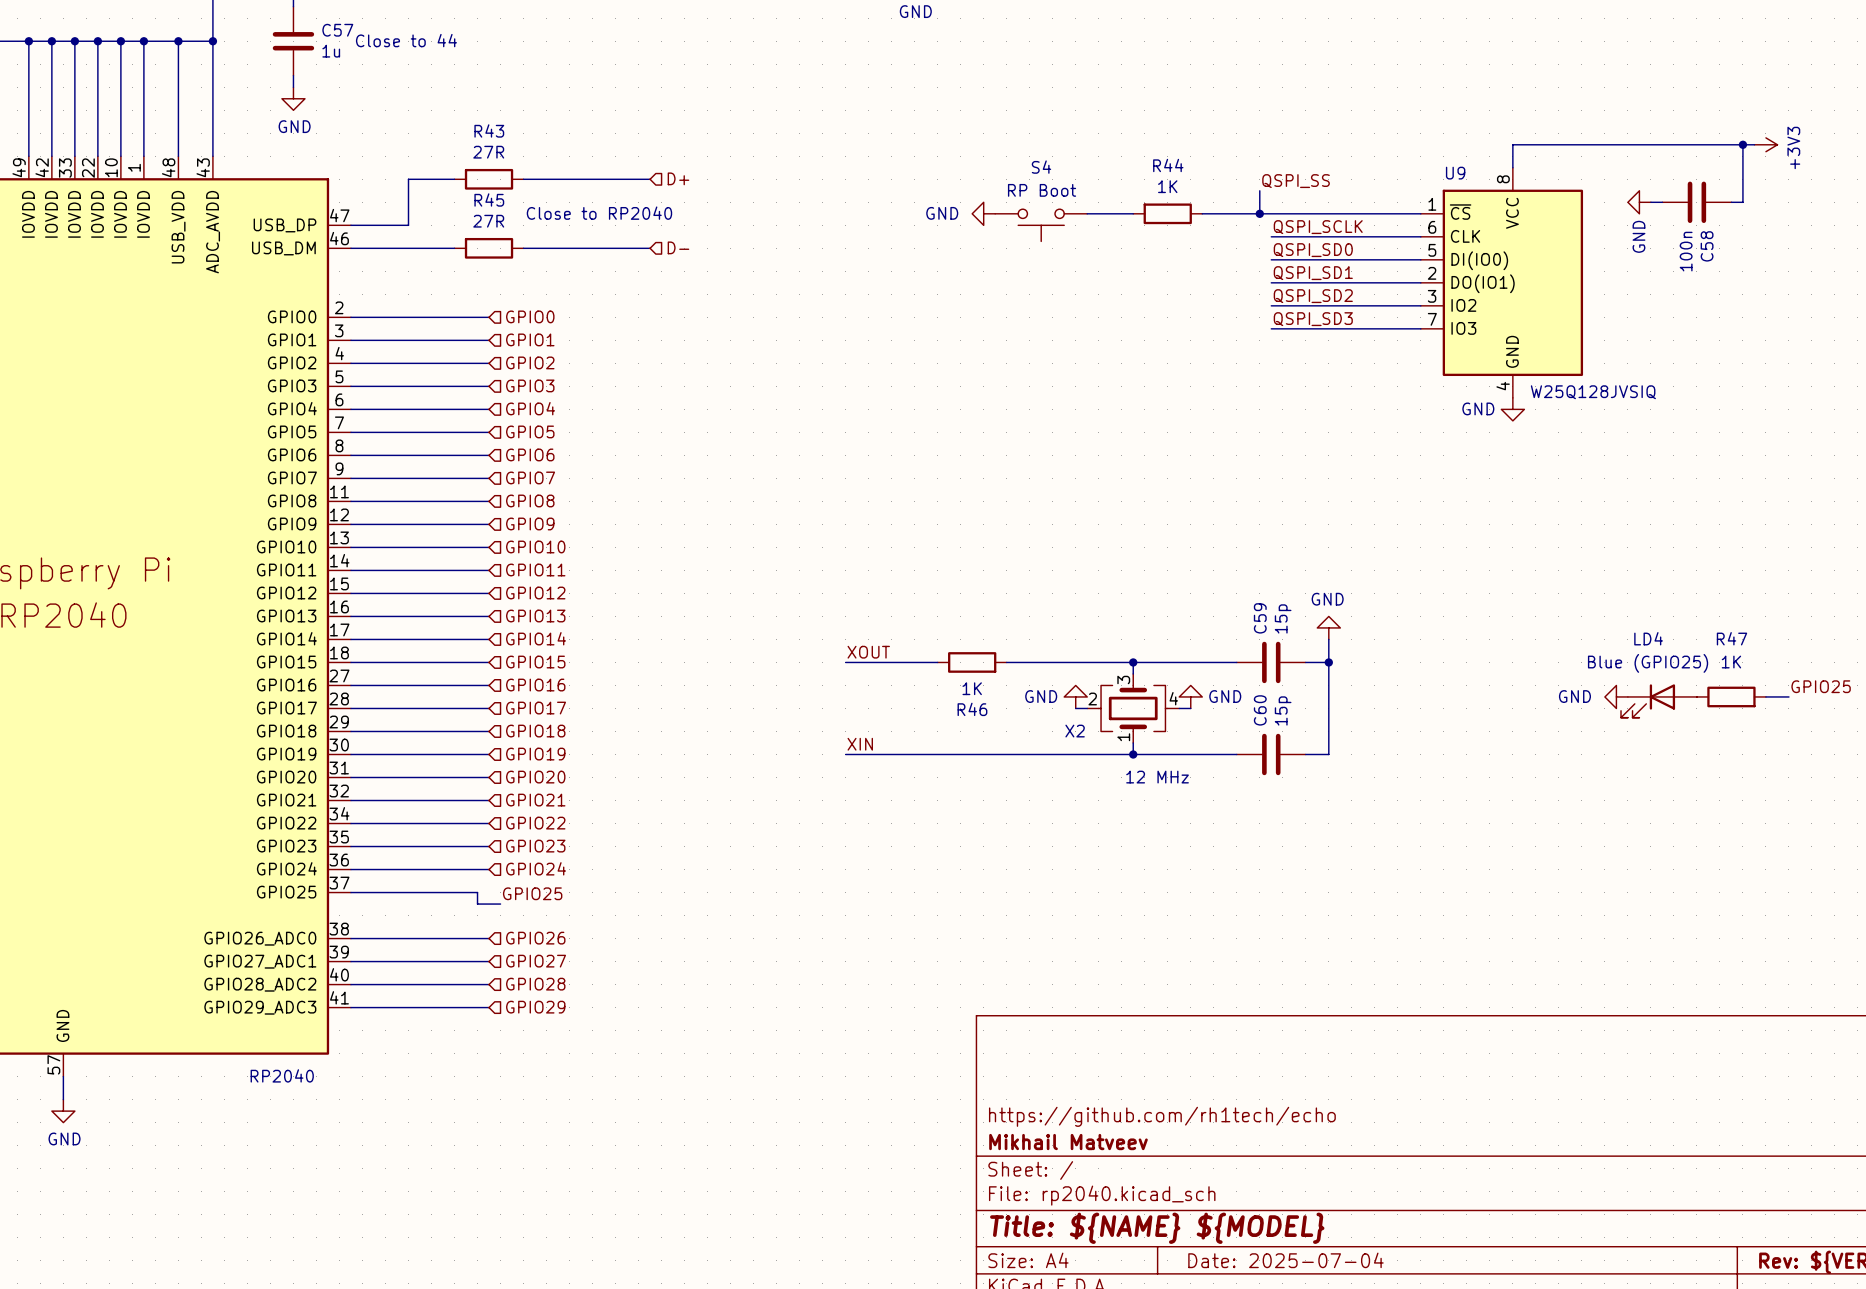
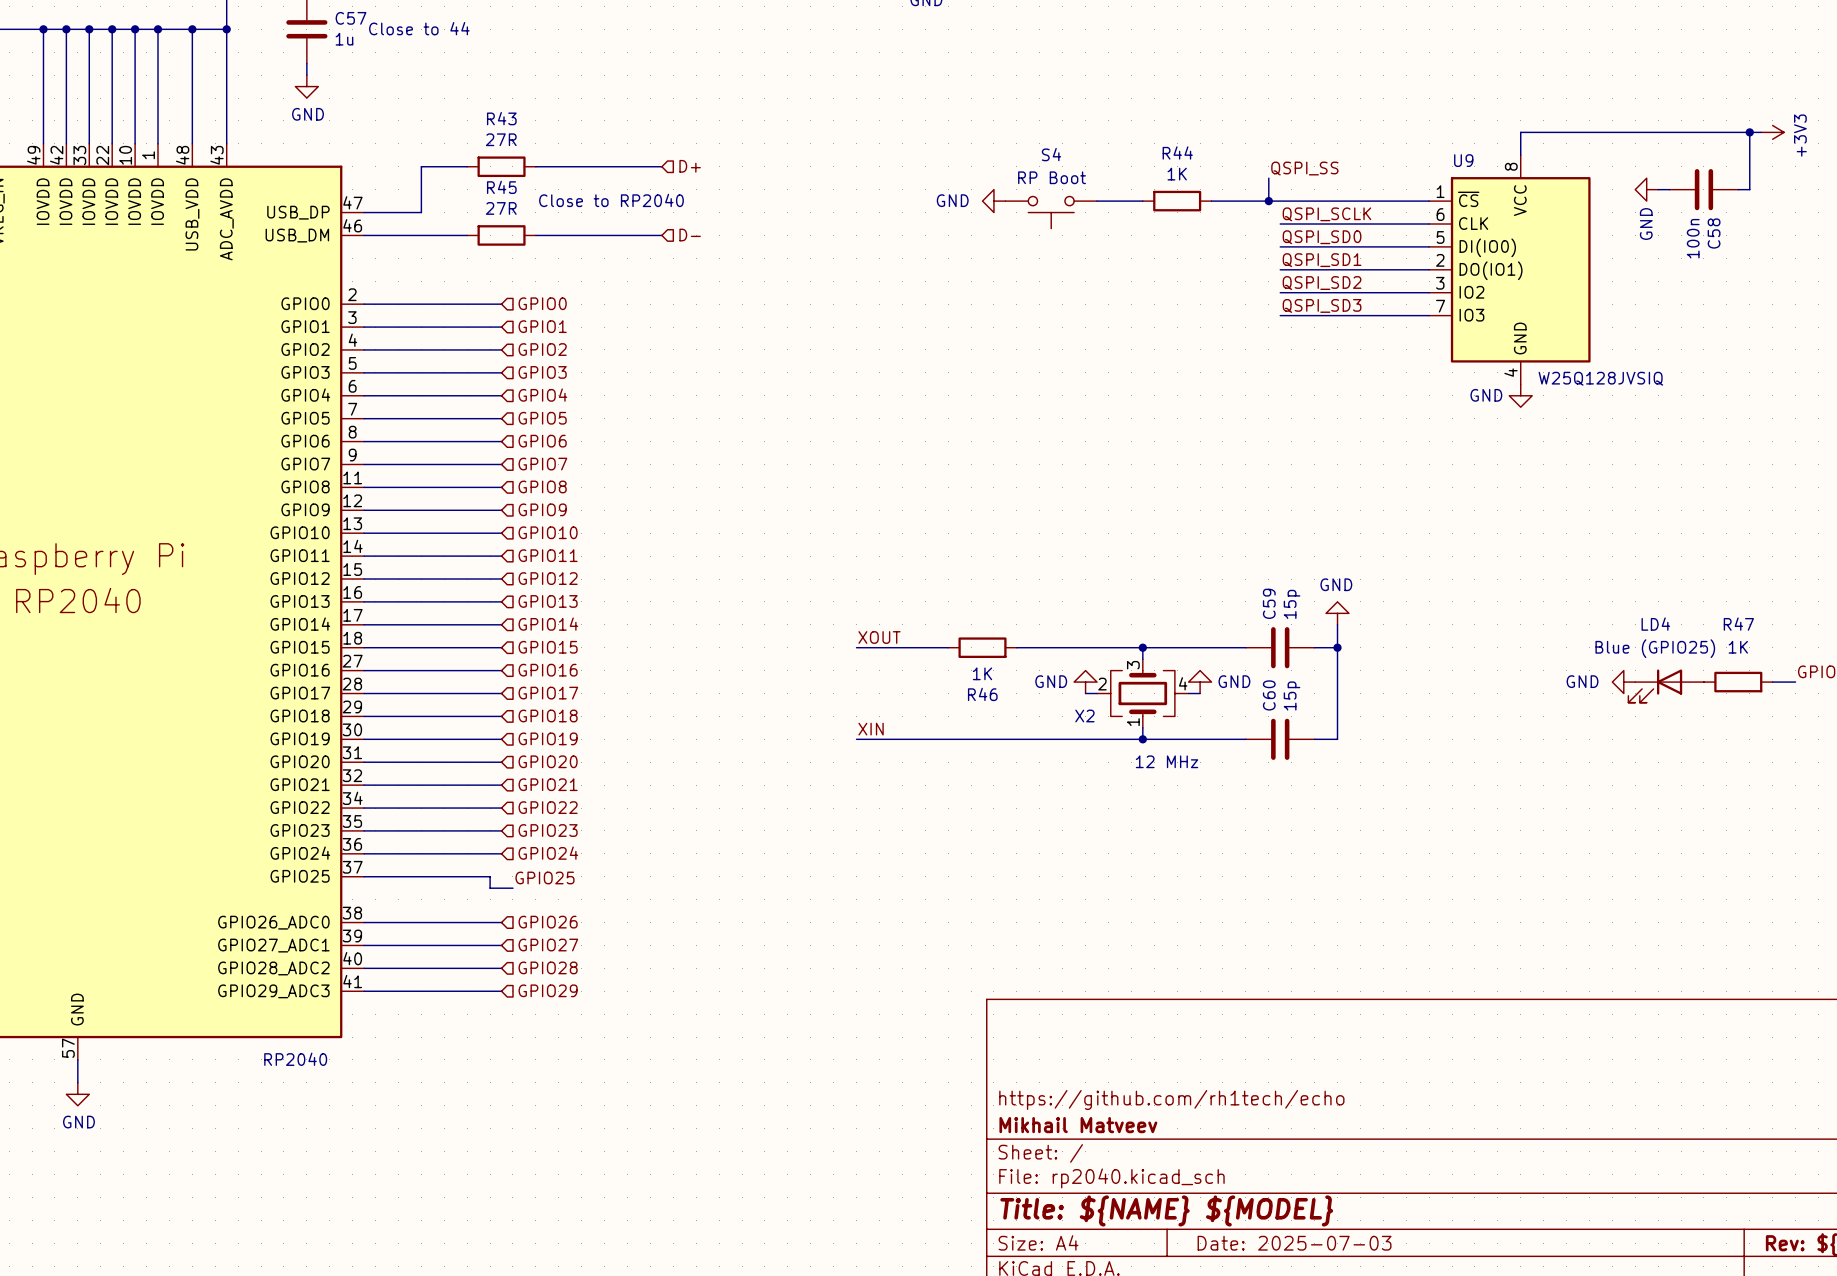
title block: Date: 2025-07-04 (1285, 1260) -> Date: 2025-07-03 (1294, 1243)

